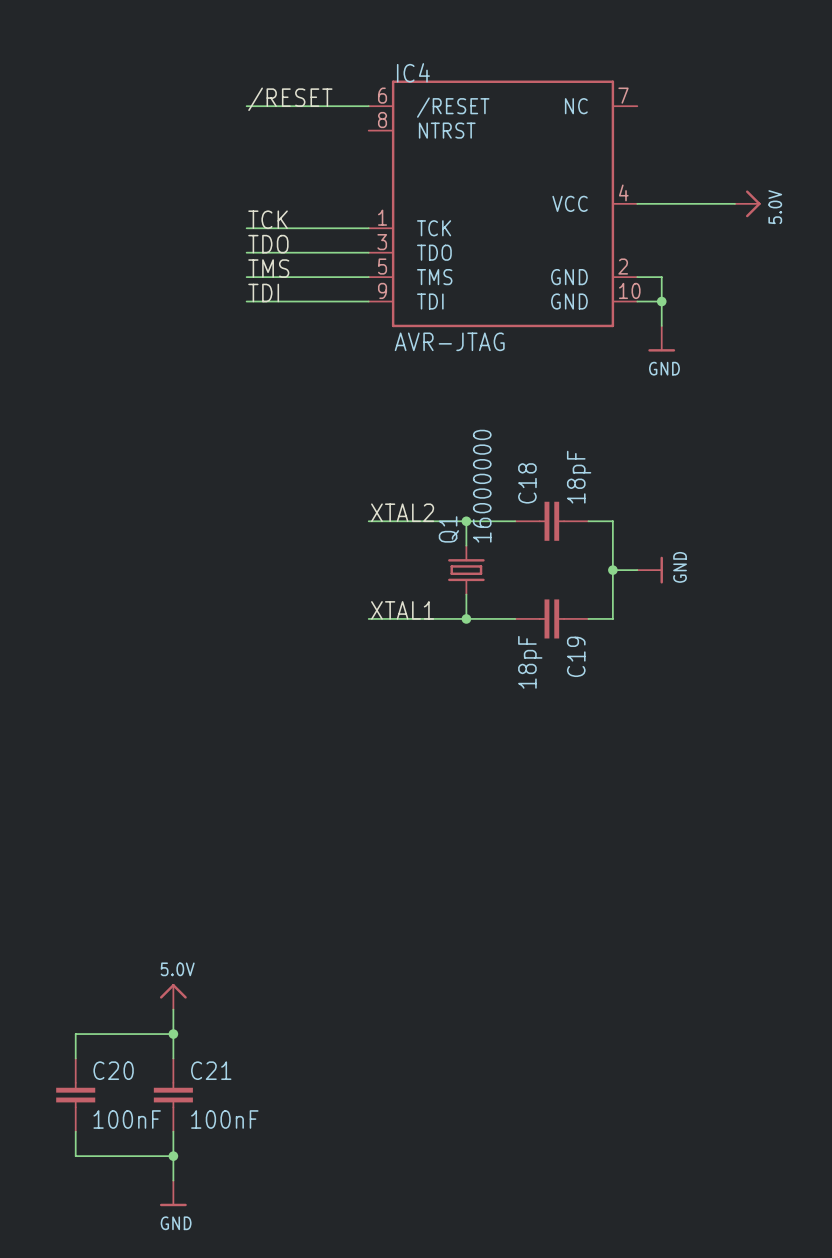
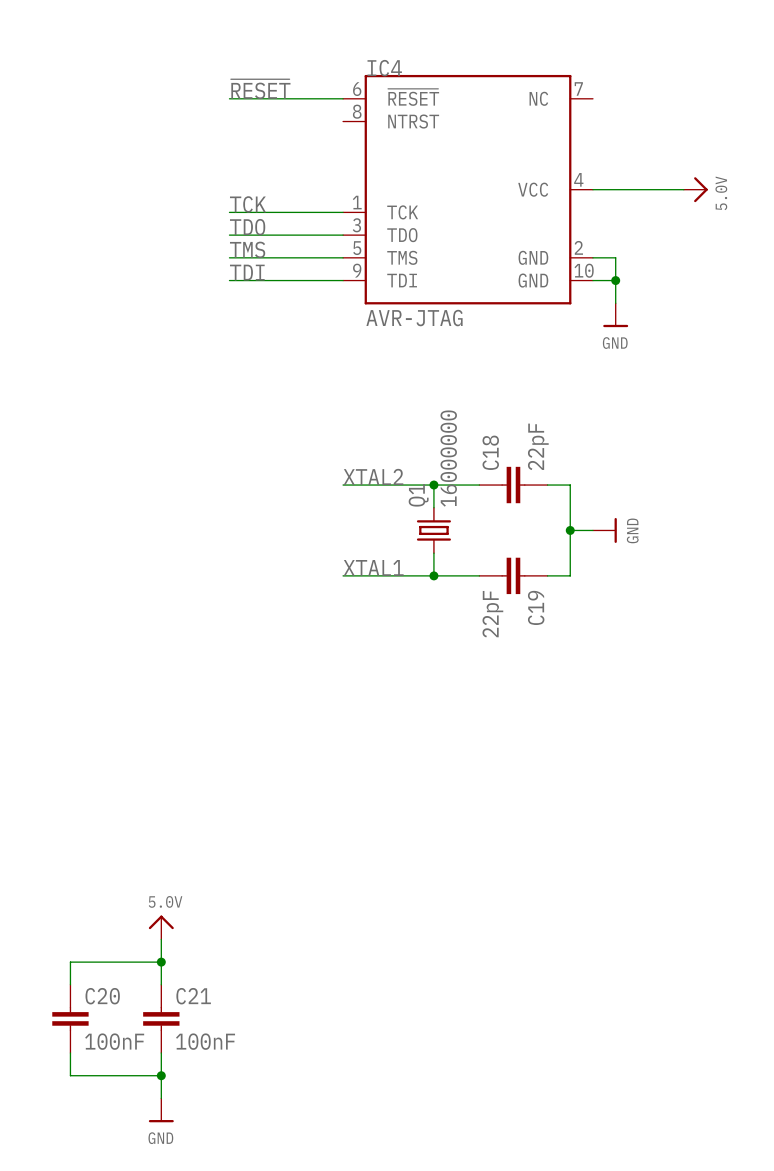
label: /RESET (290, 99) -> ~{RESET} (260, 89)
IC4 pin name: /RESET (453, 107) -> ~{RESET} (413, 97)
C18 value: 18pF (579, 477) -> 22pF (538, 446)
C19 value: 18pF (530, 662) -> 22pF (492, 614)

